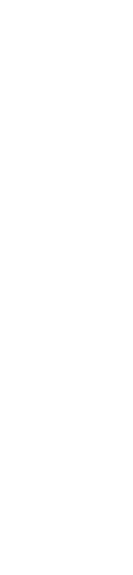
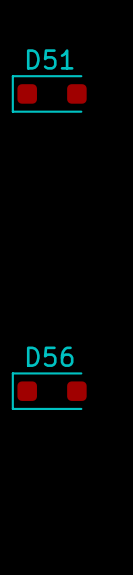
D51: none -> (49, 93)
D56: none -> (49, 391)

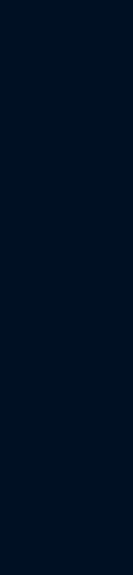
D51: (49, 93) -> none
D56: (49, 391) -> none

